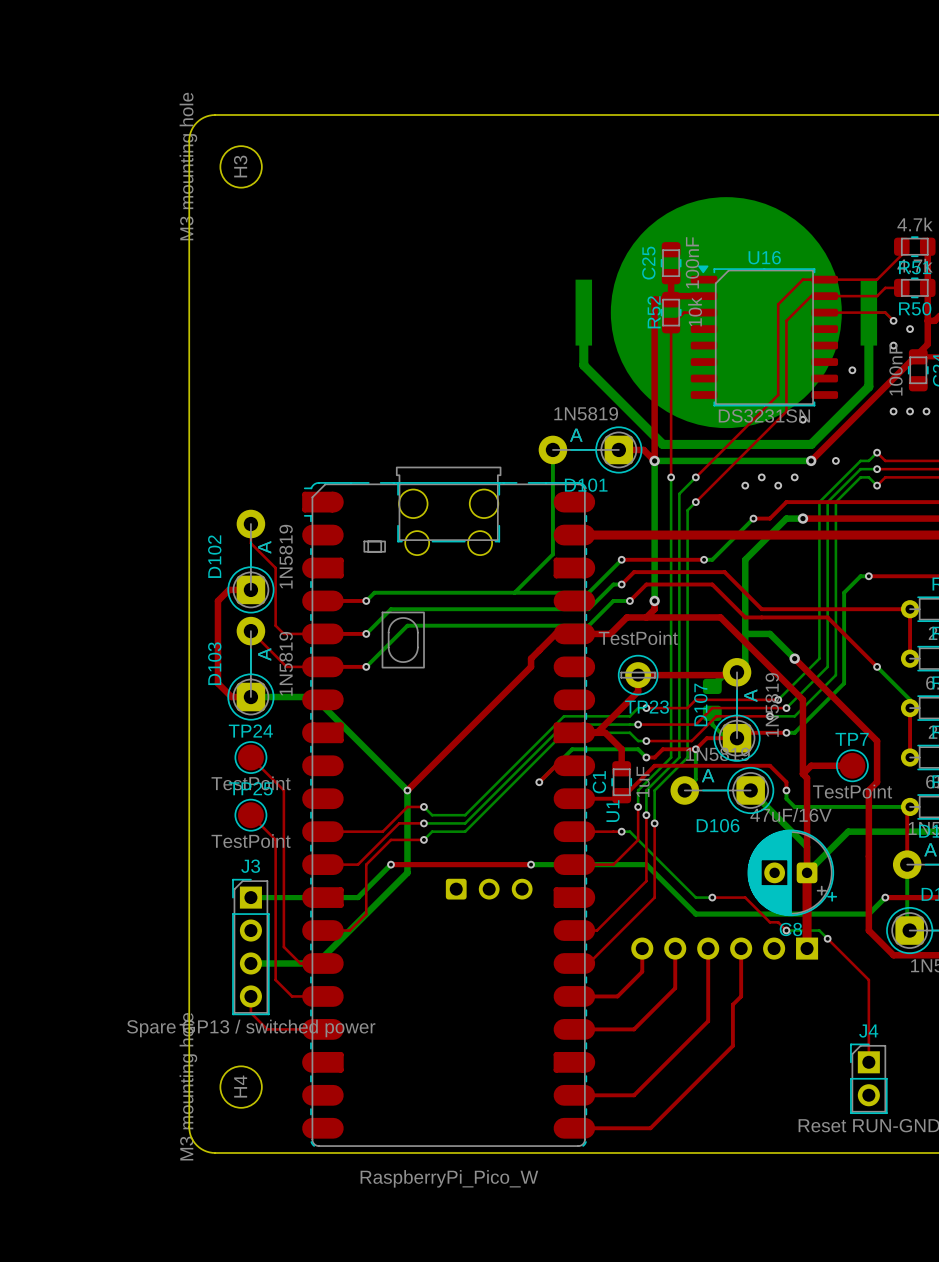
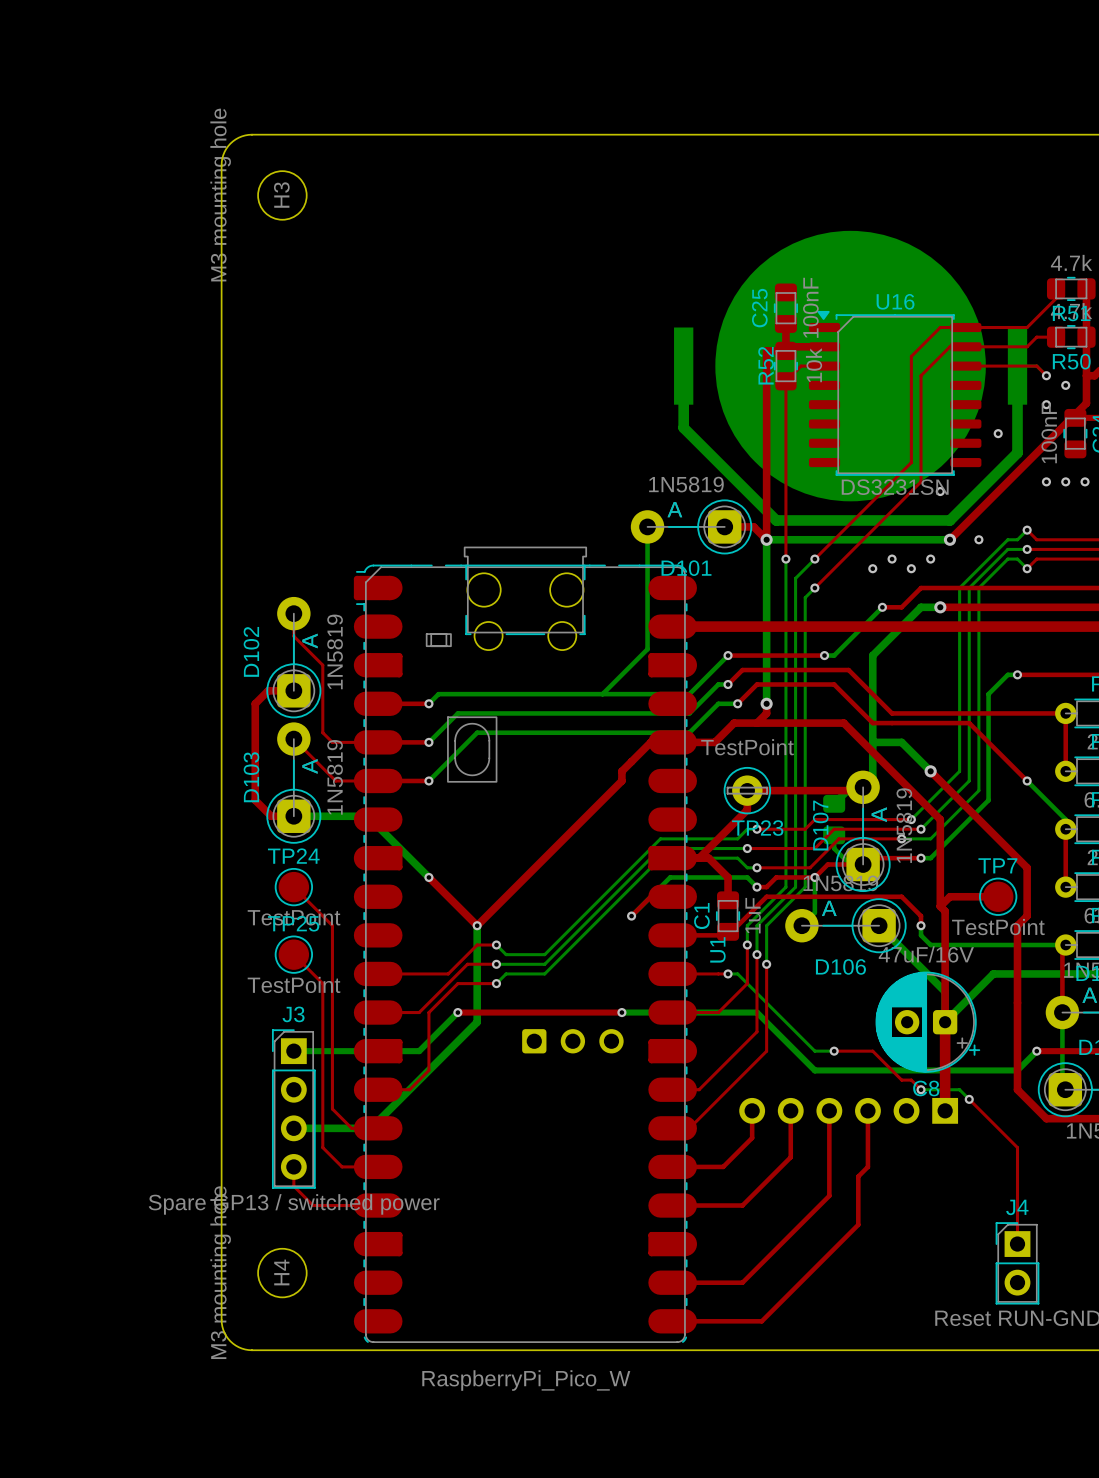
top track: none -> (428, 877) (477, 925)
bottom track: (366, 749) (407, 790) -> none
via: none -> (428, 877)

